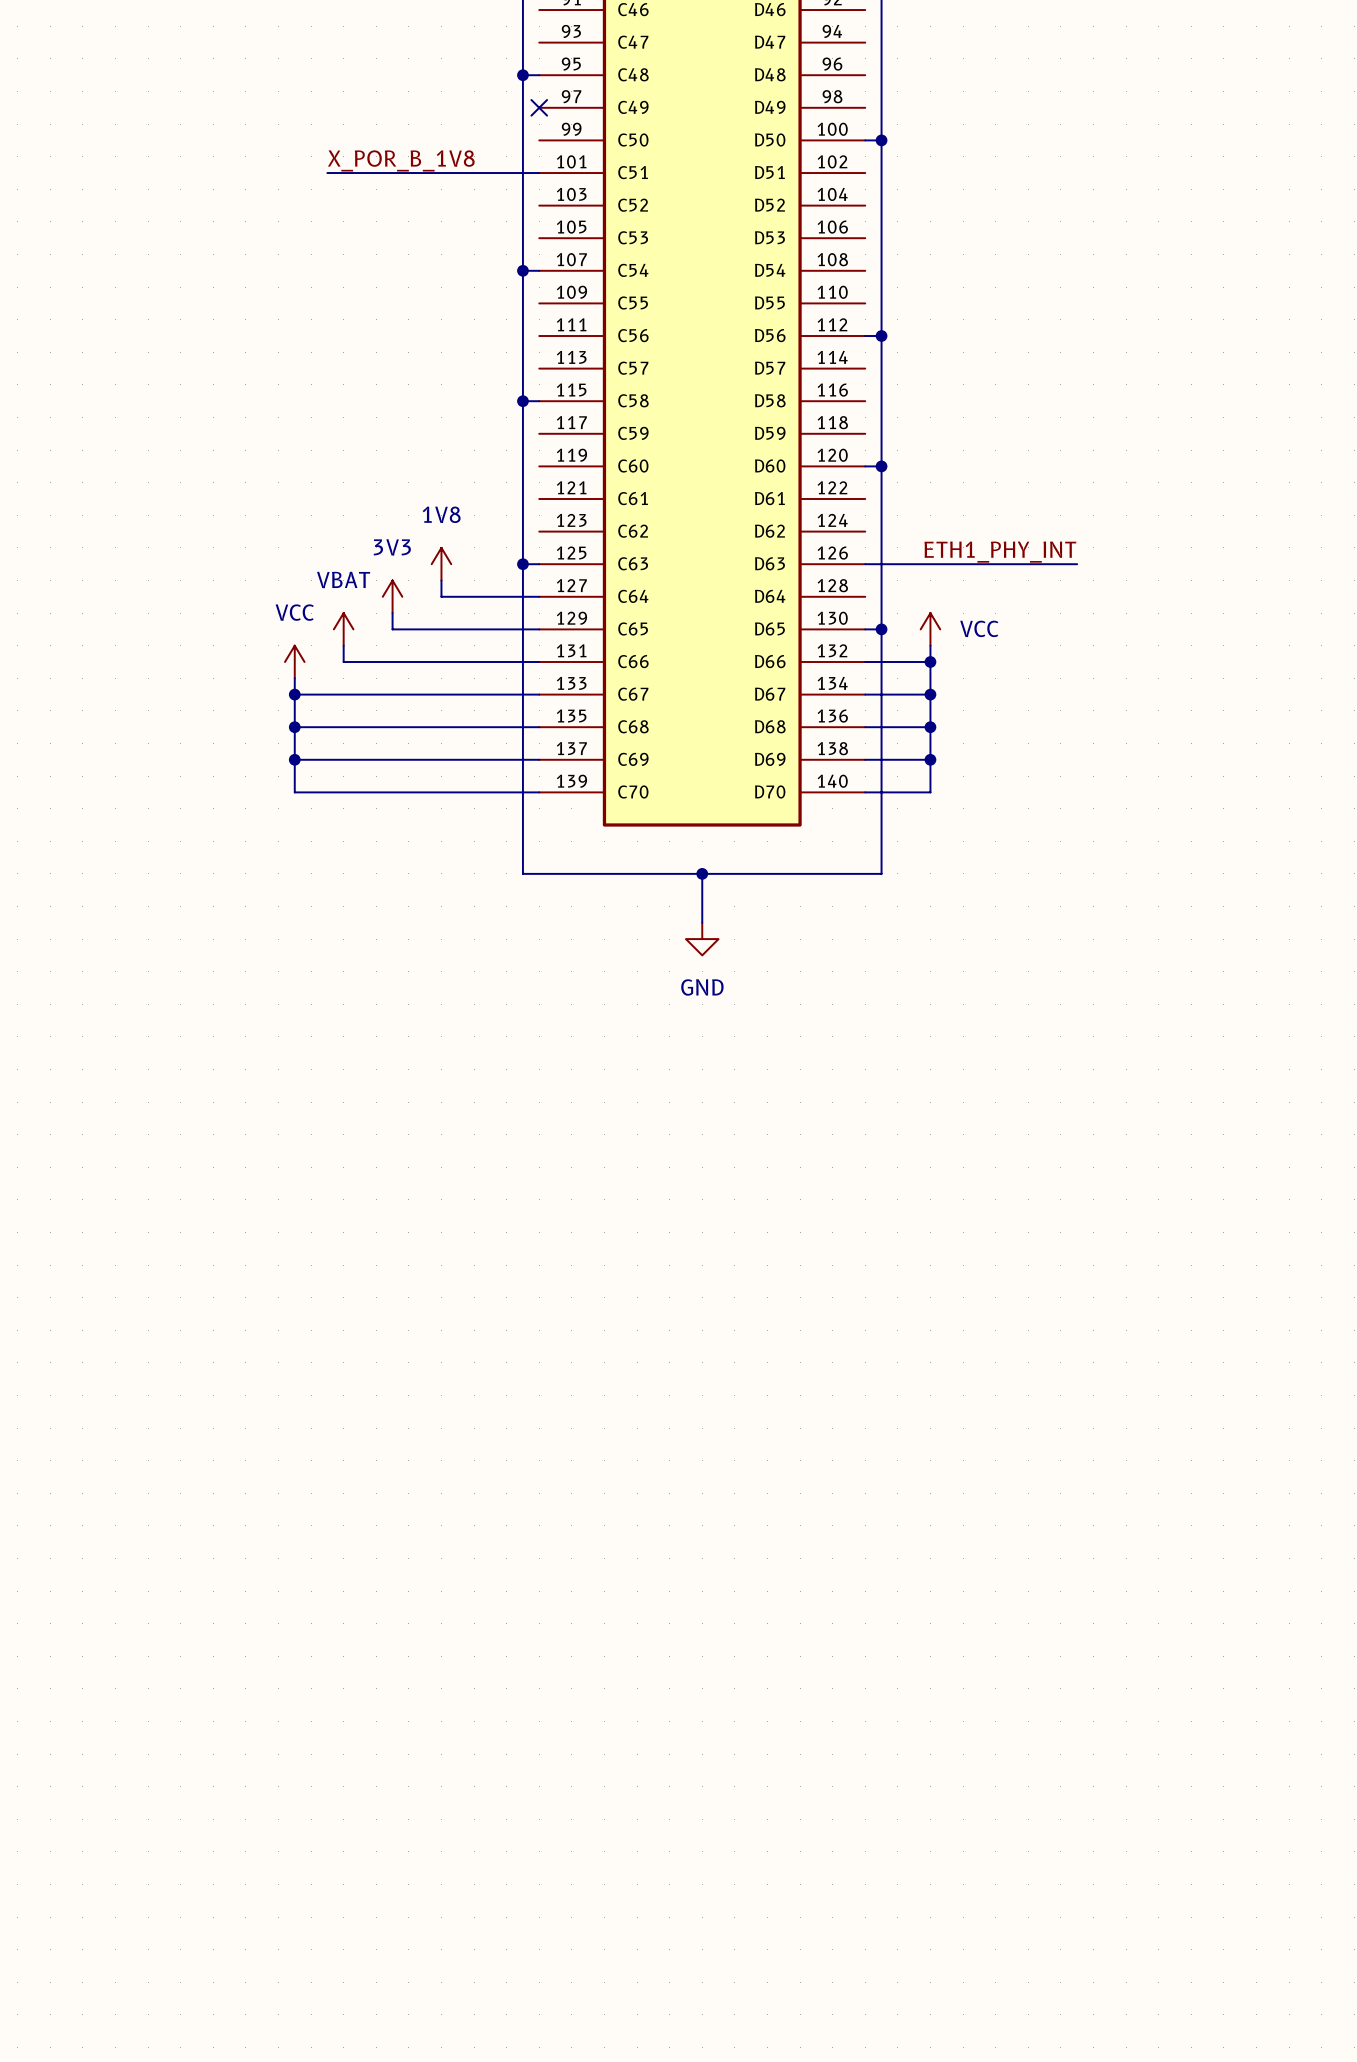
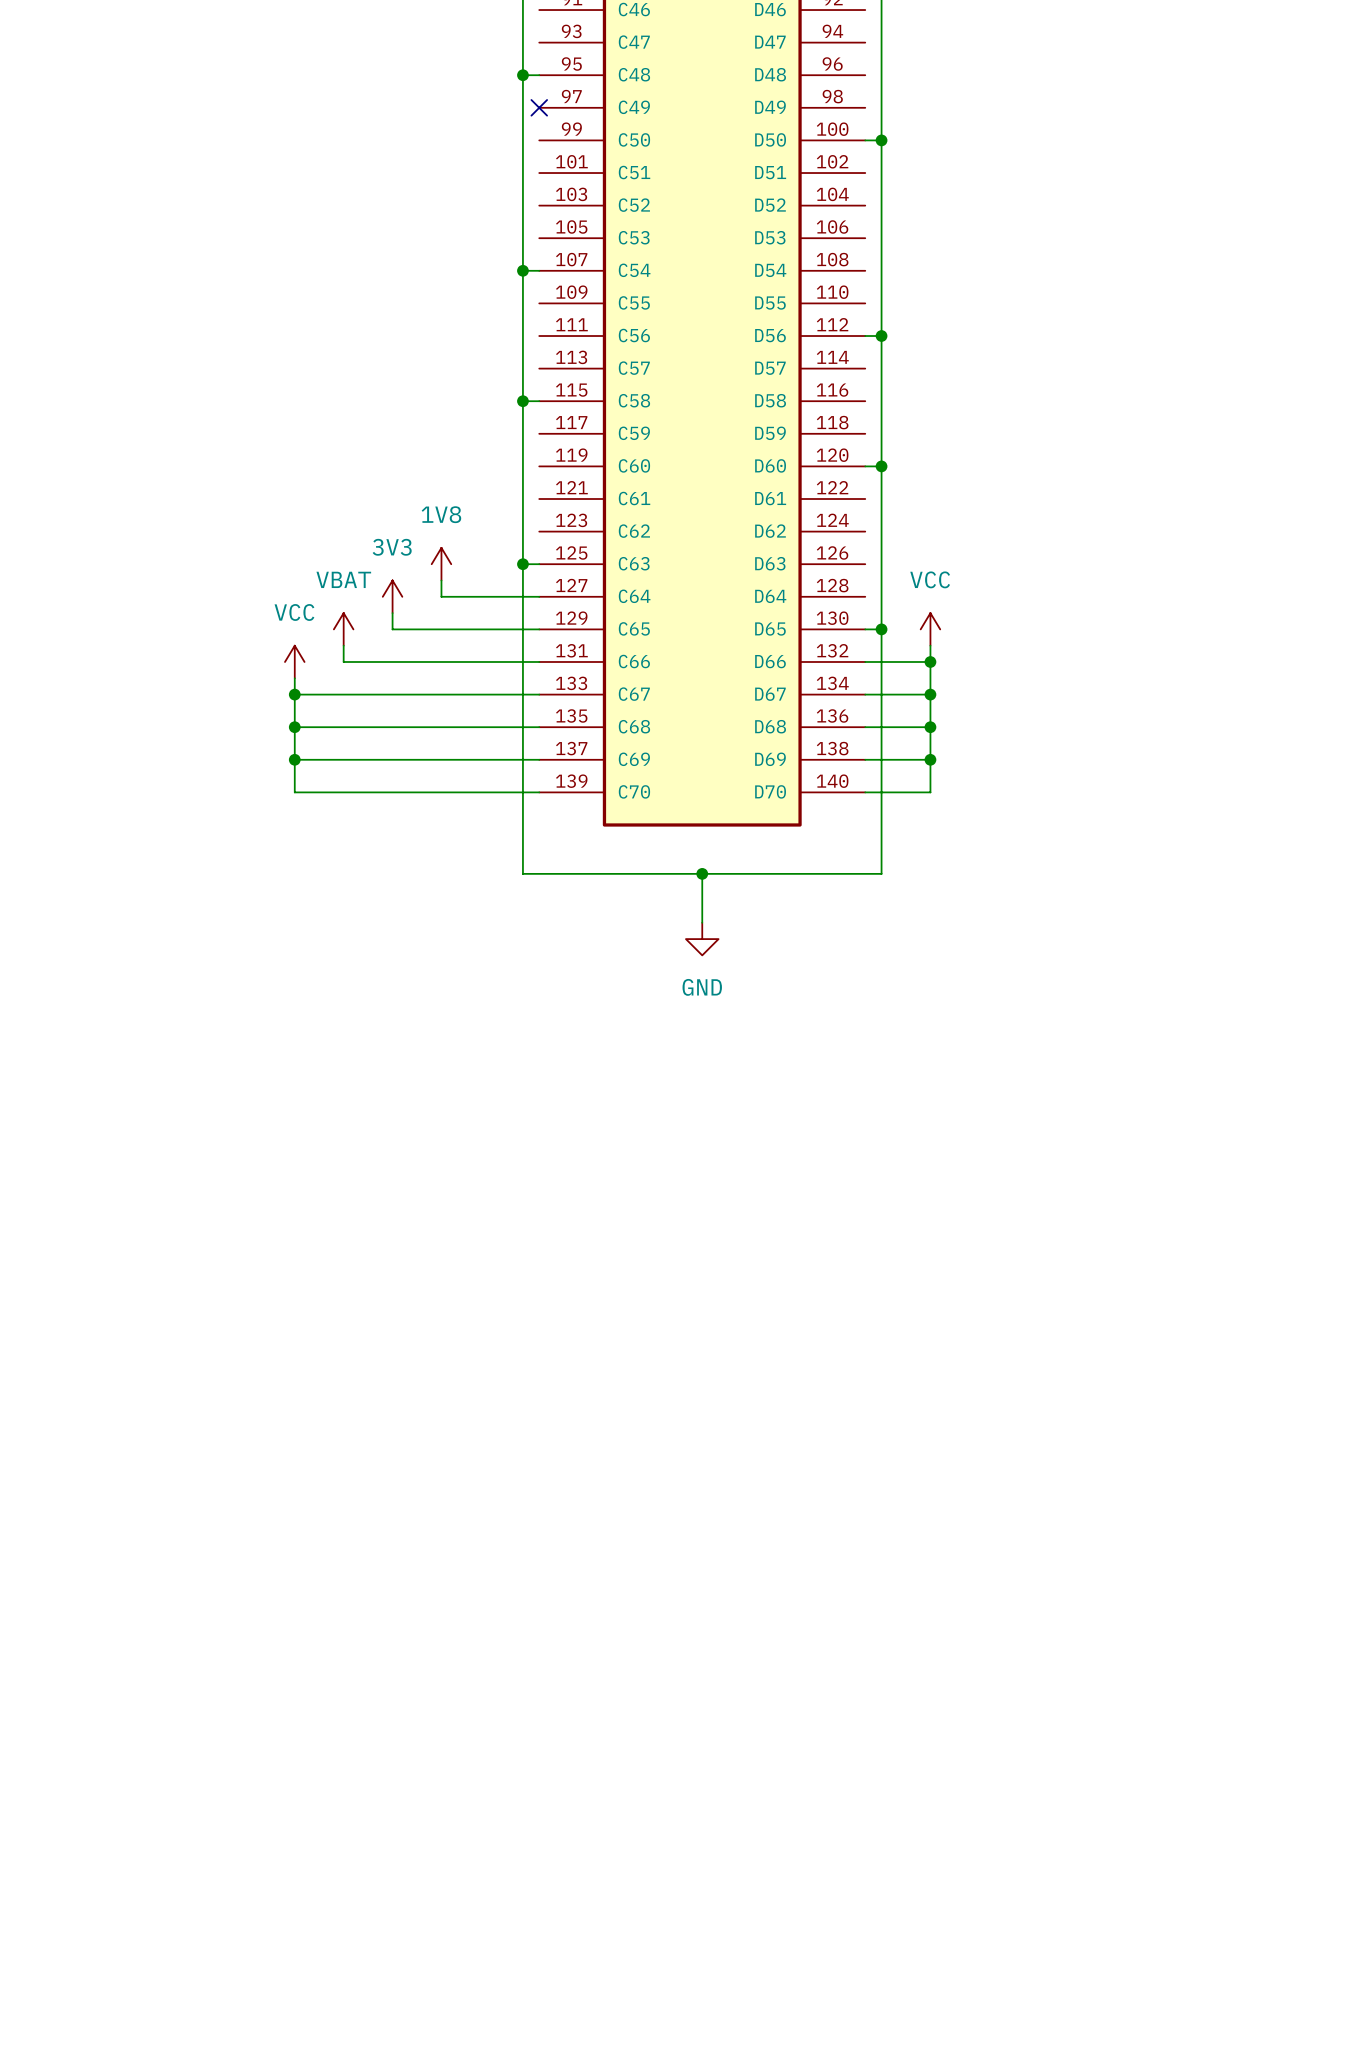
label: X_POR_B_1V8 (401, 160) -> none
wire: (327, 173) (539, 173) -> none
label: ETH1_PHY_INT (1000, 552) -> none
wire: (865, 564) (1077, 564) -> none
power symbol text position: VCC (979, 628) -> VCC (930, 579)

